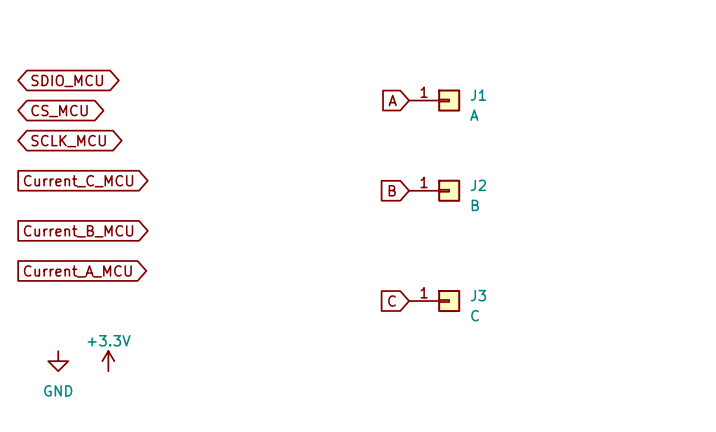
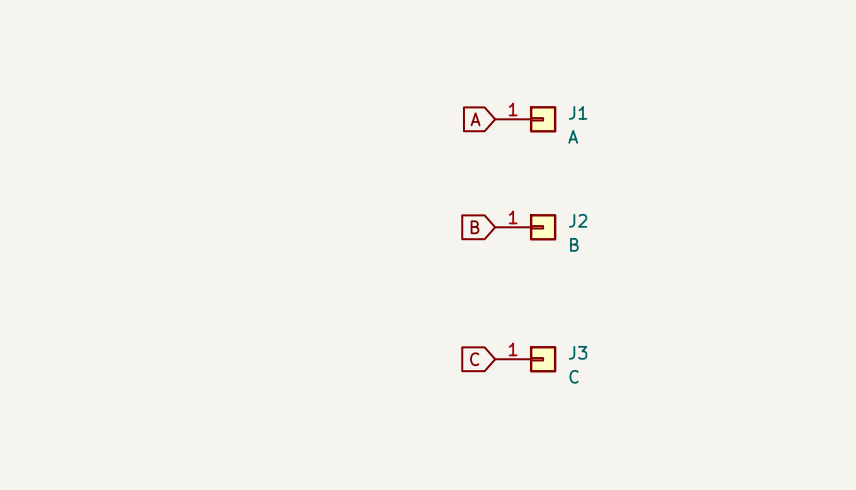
global label: SDIO_MCU (67, 80) -> none
global label: CS_MCU (59, 111) -> none
global label: SCLK_MCU (68, 141) -> none
global label: Current_C_MCU (78, 181) -> none
global label: Current_B_MCU (78, 231) -> none
global label: Current_A_MCU (77, 271) -> none
power symbol: GND (58, 361) -> none
power symbol: +3.3V (108, 361) -> none

